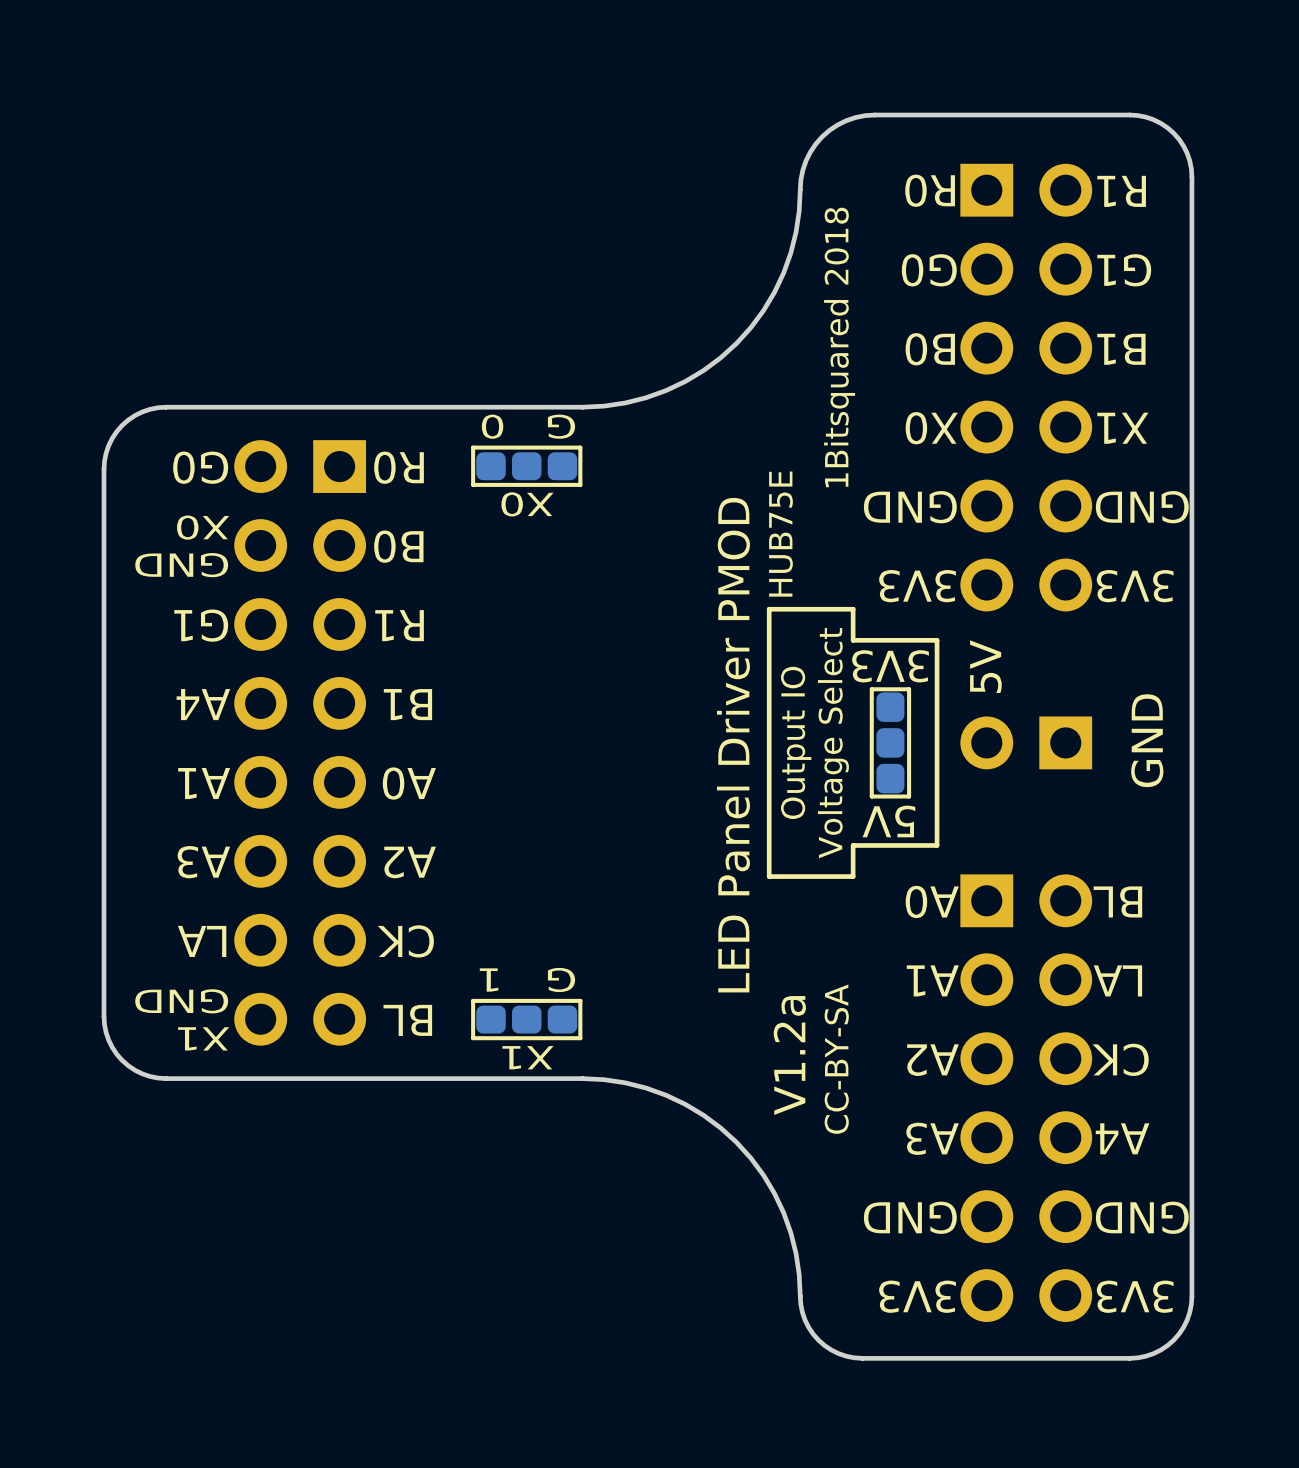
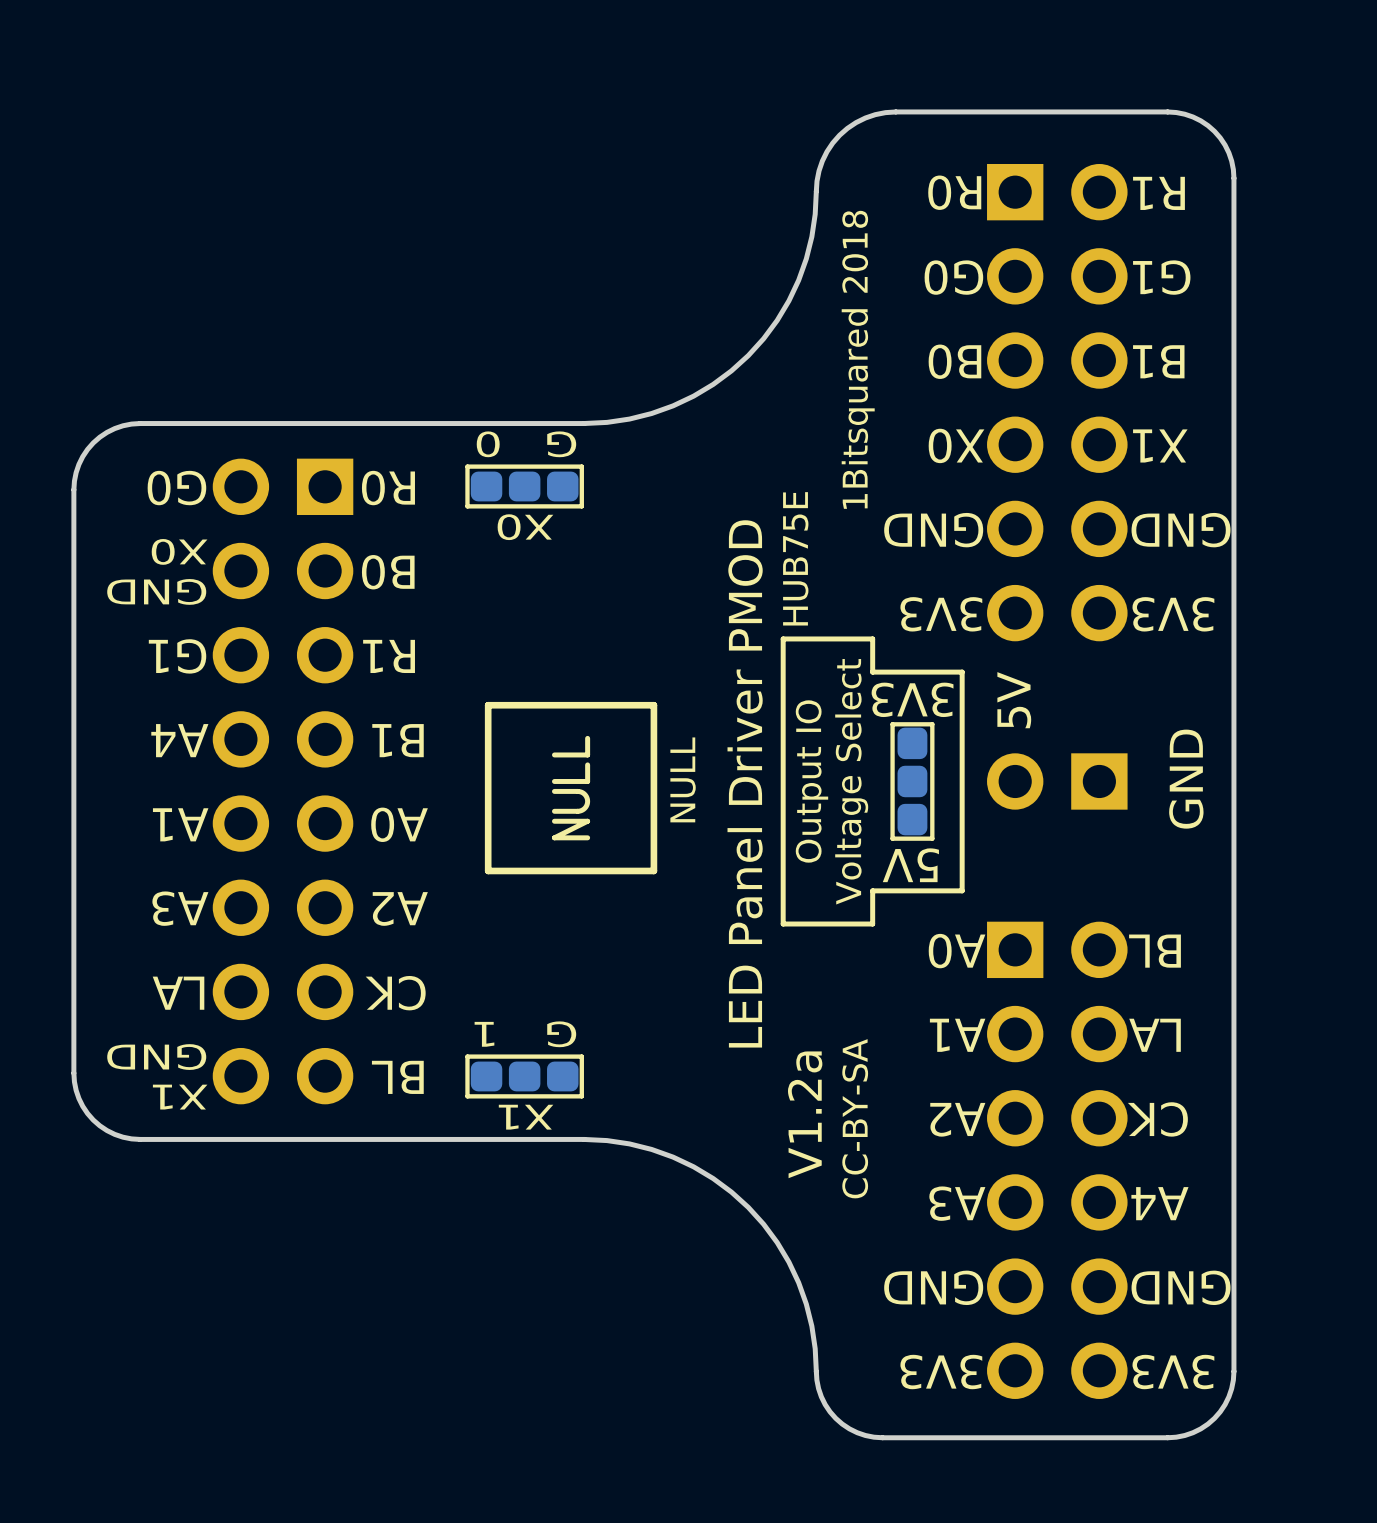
drawing: none -> [484, 701, 658, 875]
text: none -> NULL (683, 779)

